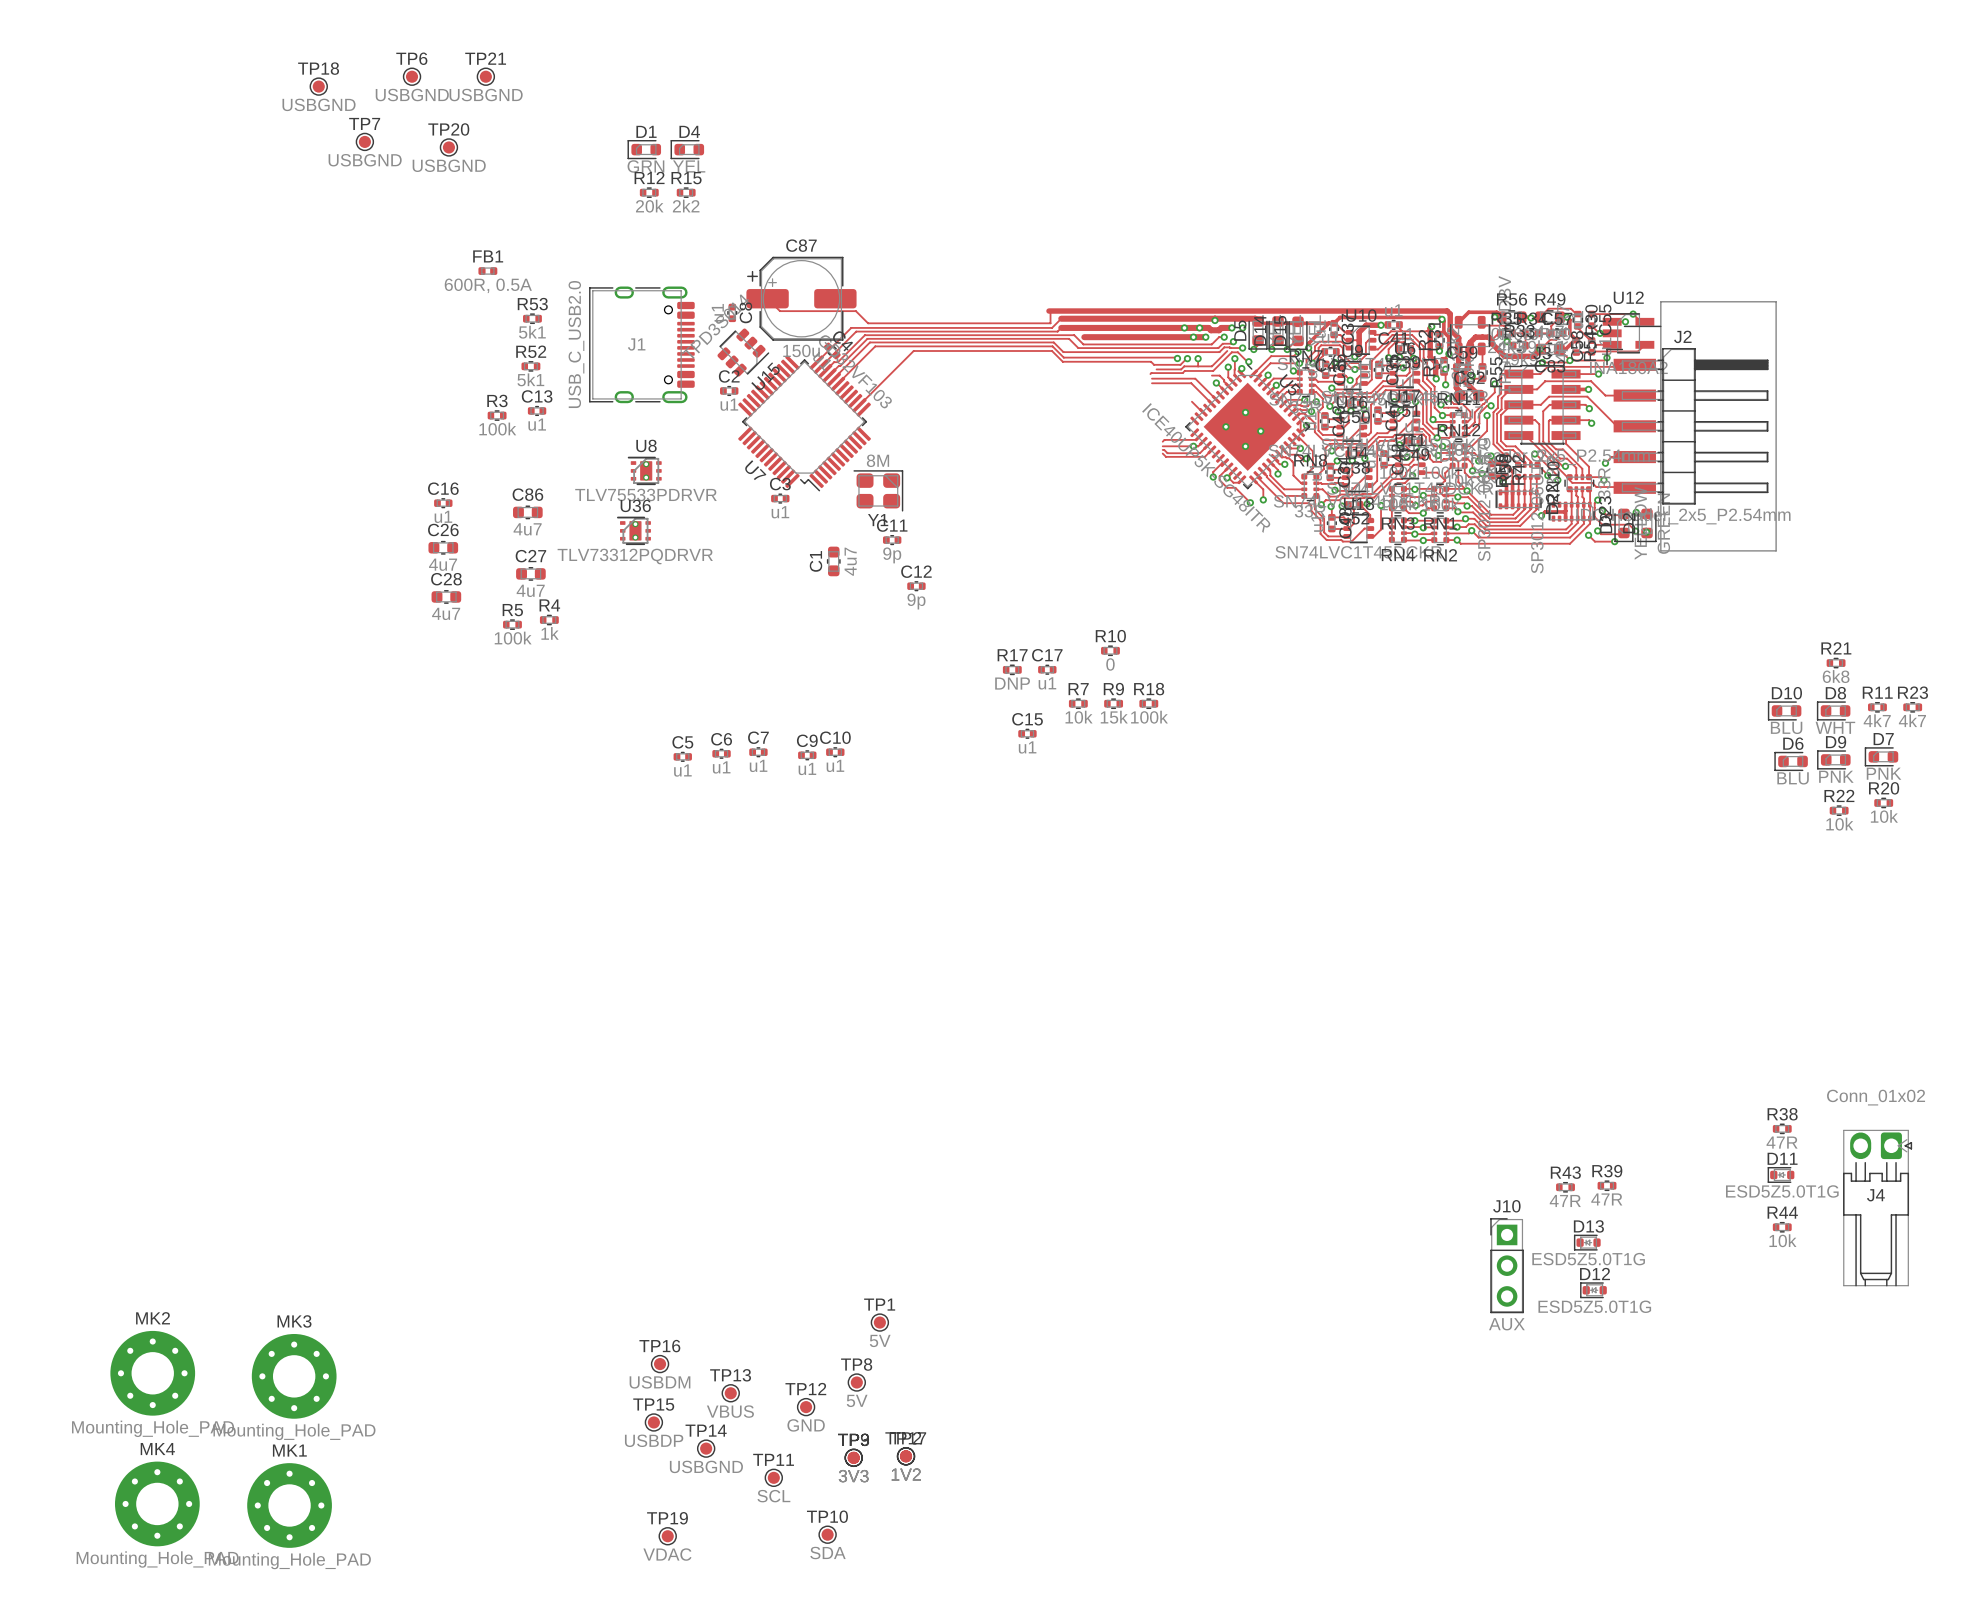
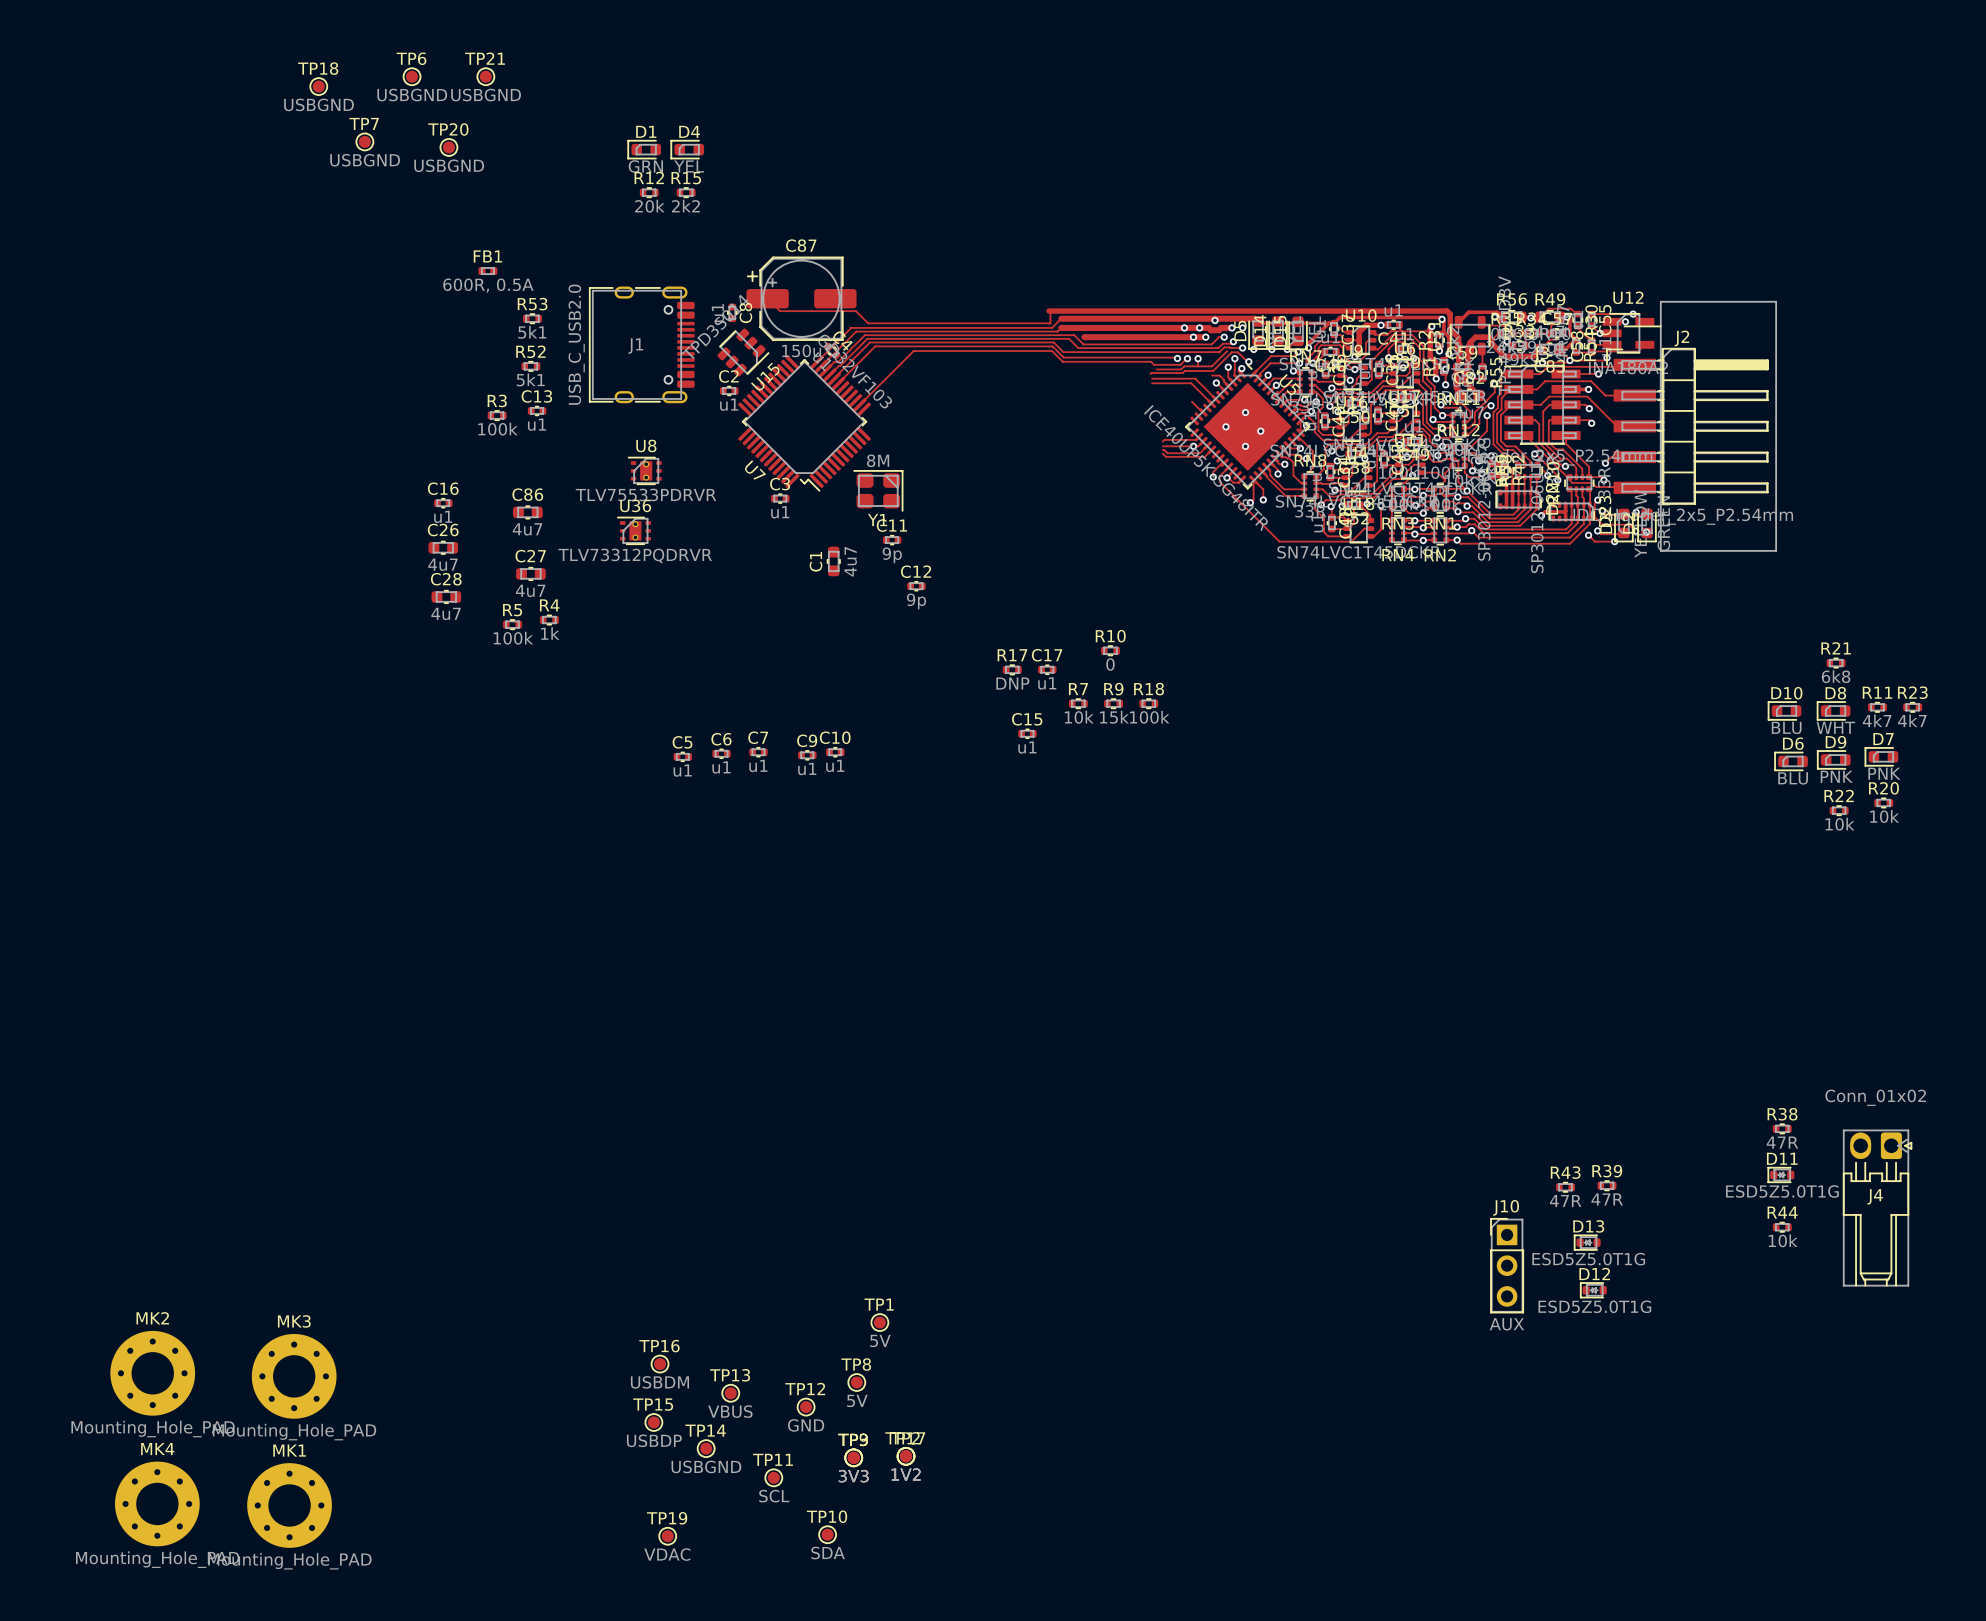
track: (1257, 475) (1283, 503) (1308, 503) (1311, 505) (1311, 510) (1320, 520) (1320, 533) (1326, 540) (1342, 541) -> (1219, 476) (1219, 481) (1279, 541) (1342, 541)
track: (1219, 476) (1219, 480) (1227, 487) (1235, 487) (1250, 502) -> (1253, 479) (1253, 499) (1250, 502)

